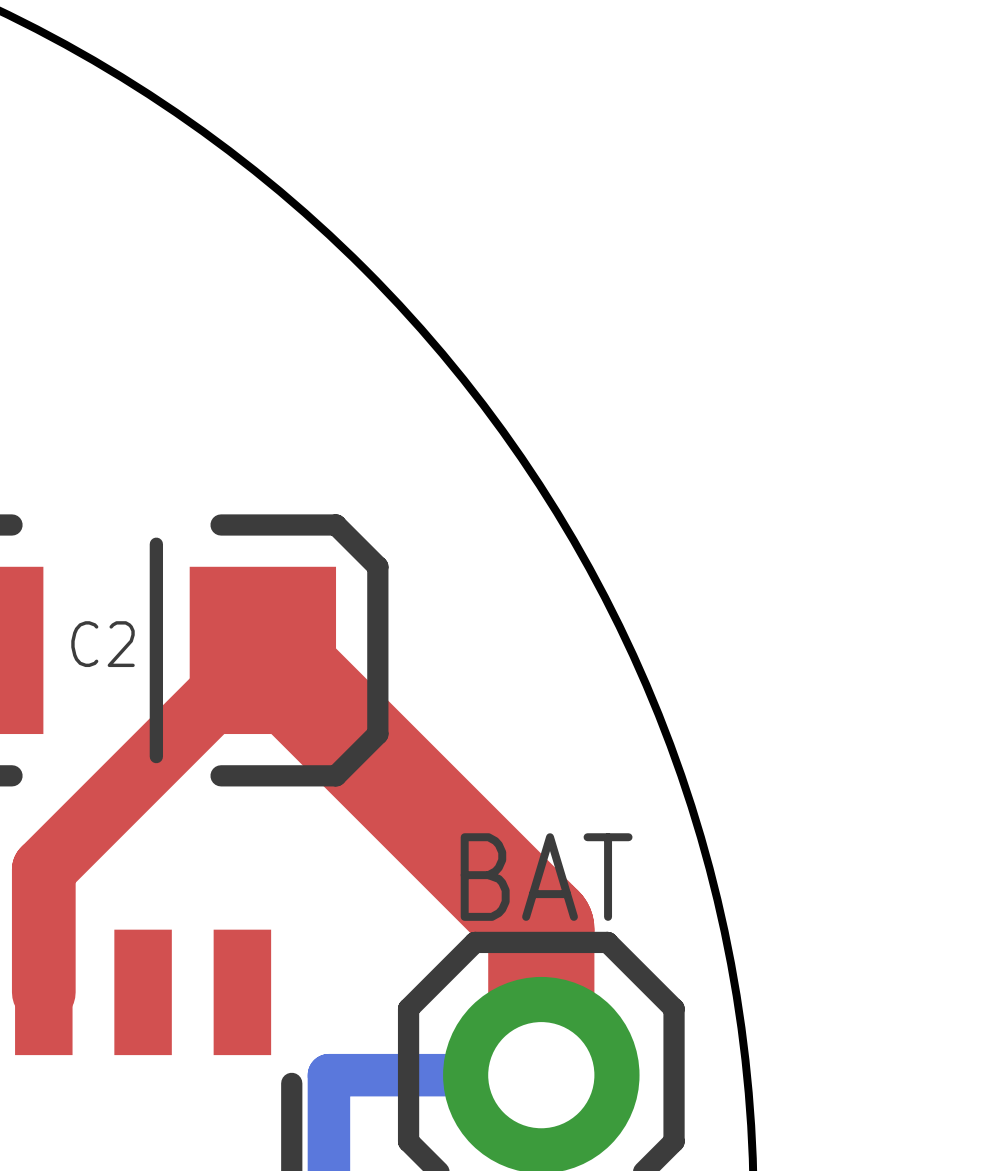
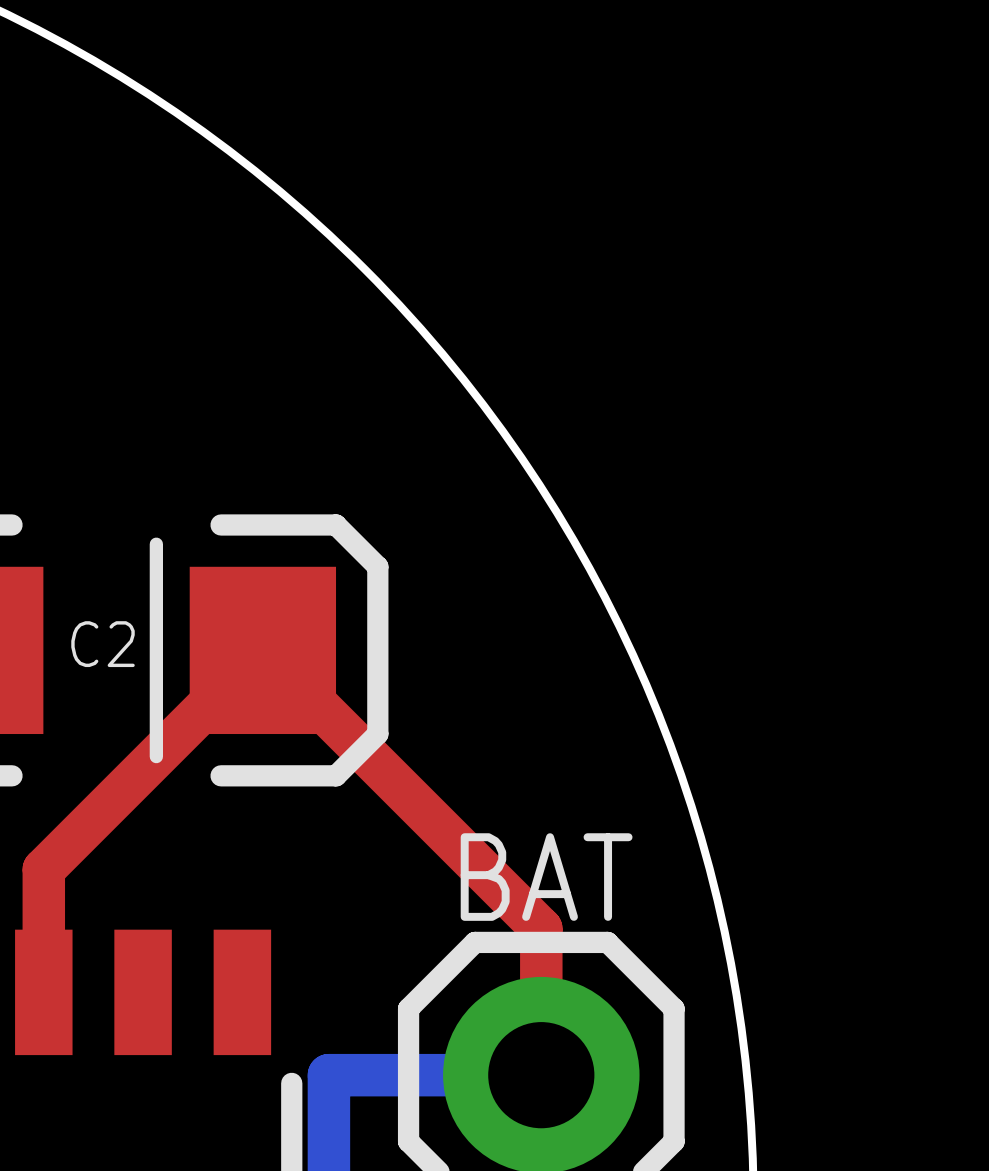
top track width: thick (43, 992) (43, 869) (262, 650) (541, 928) (541, 1075) -> thin (43, 992) (43, 869) (262, 650) (541, 928) (541, 1075)

